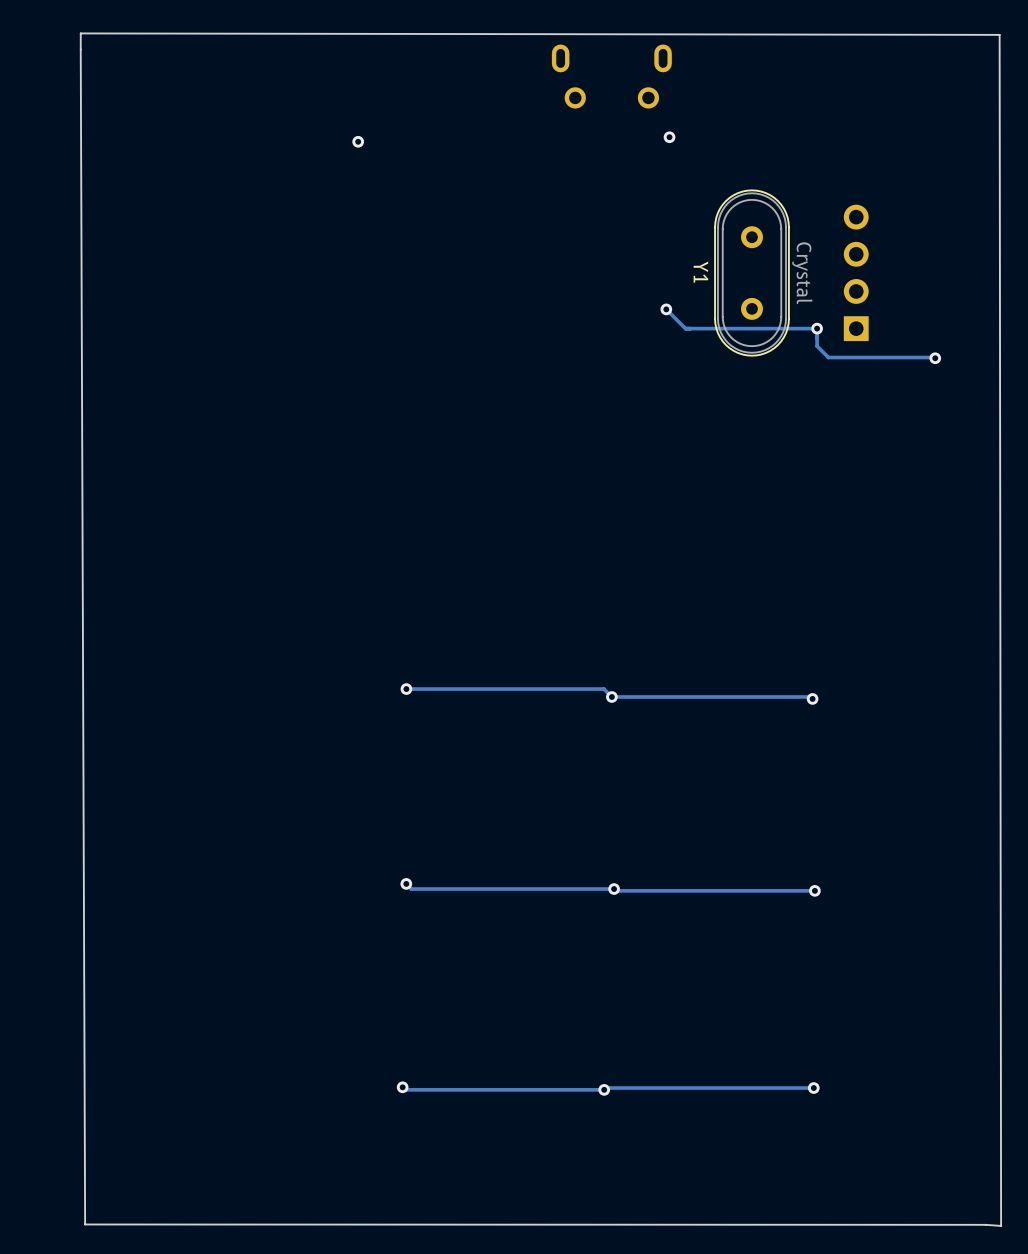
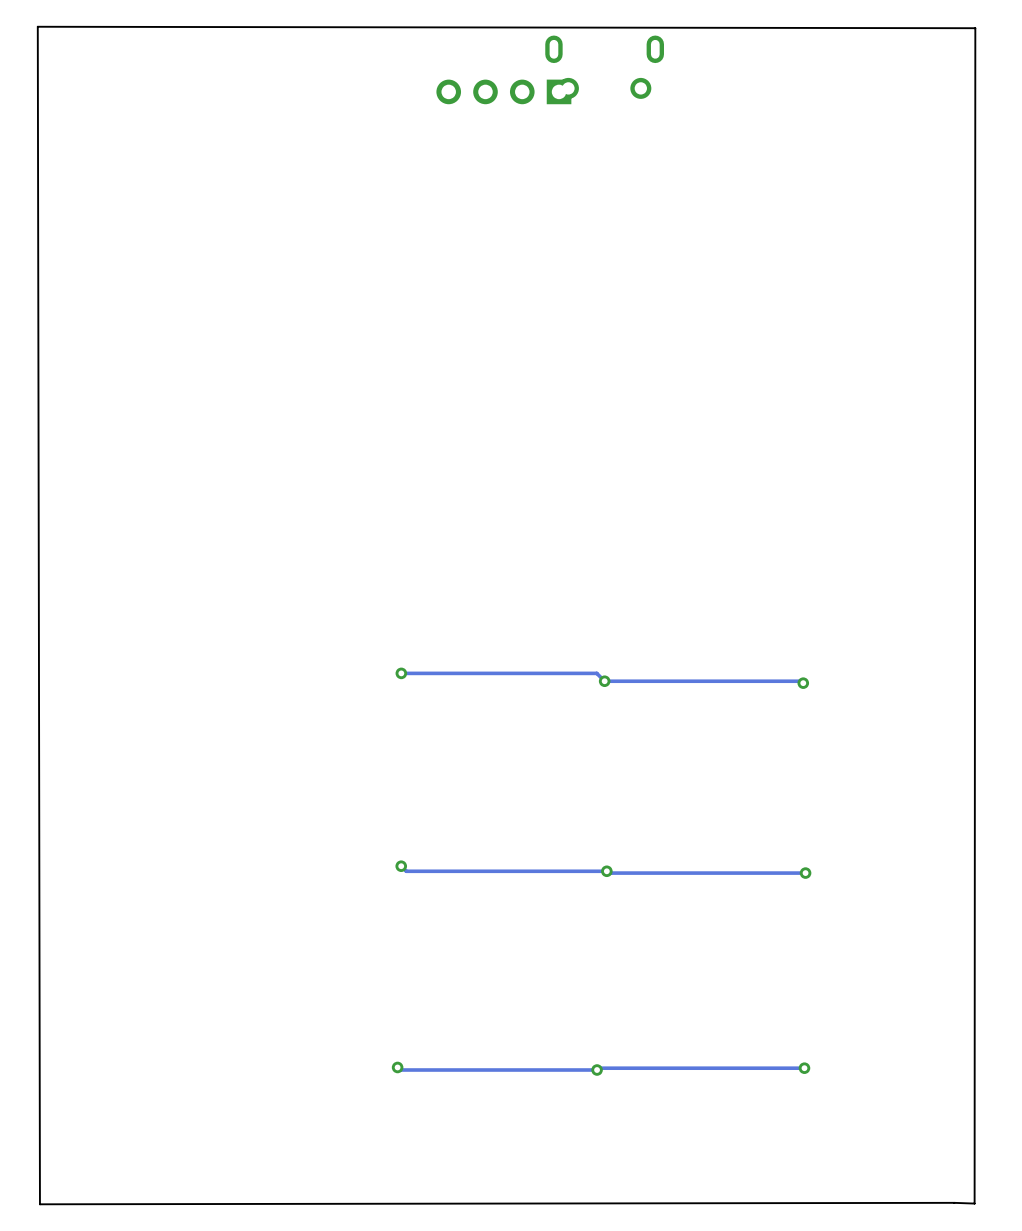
board edge: (80, 33) (999, 34) (1001, 1225) (85, 1224) (80, 33) -> (37, 26) (975, 28) (974, 1203) (39, 1204) (37, 26)
part: none -> (503, 91)
via: (669, 137) -> none
via: (358, 141) -> none
part: (856, 272) -> none
Y1: Crystal (751, 273) -> none
track: (666, 309) (685, 328) (817, 328) (817, 346) (828, 357) (935, 357) -> none
via: (666, 309) -> none
via: (817, 328) -> none
via: (935, 358) -> none

